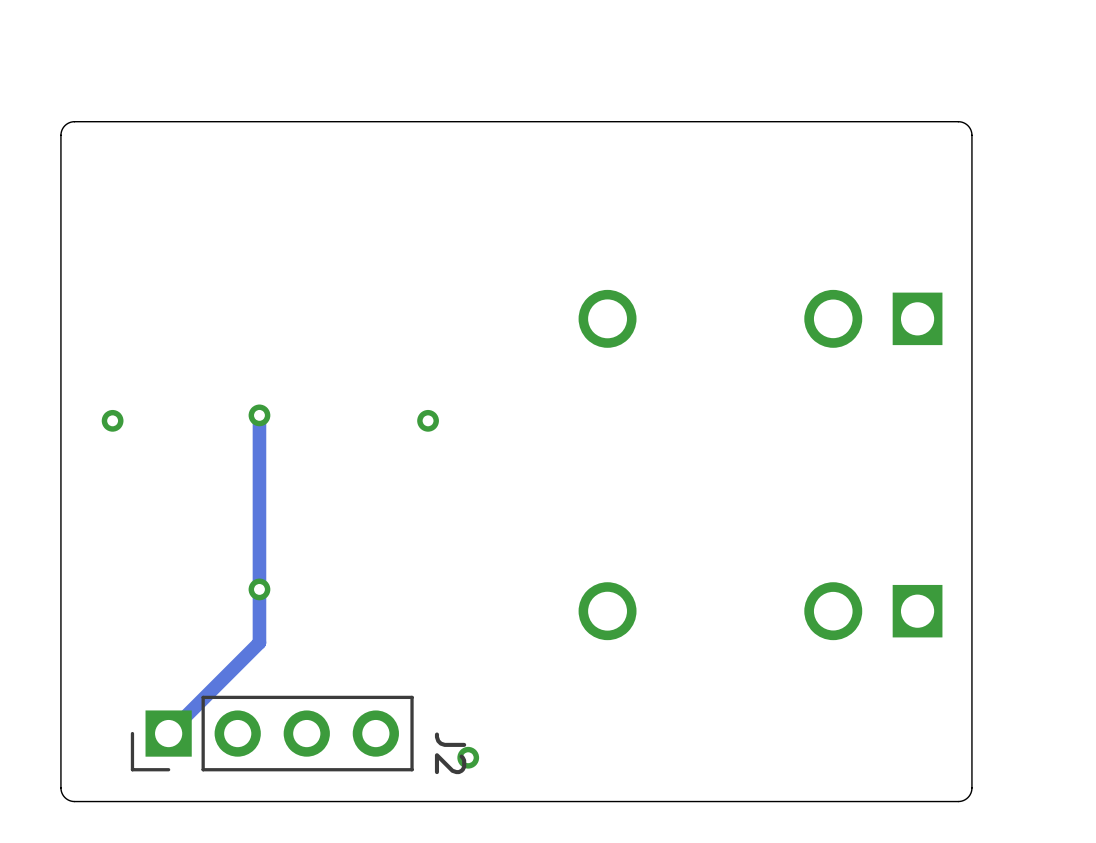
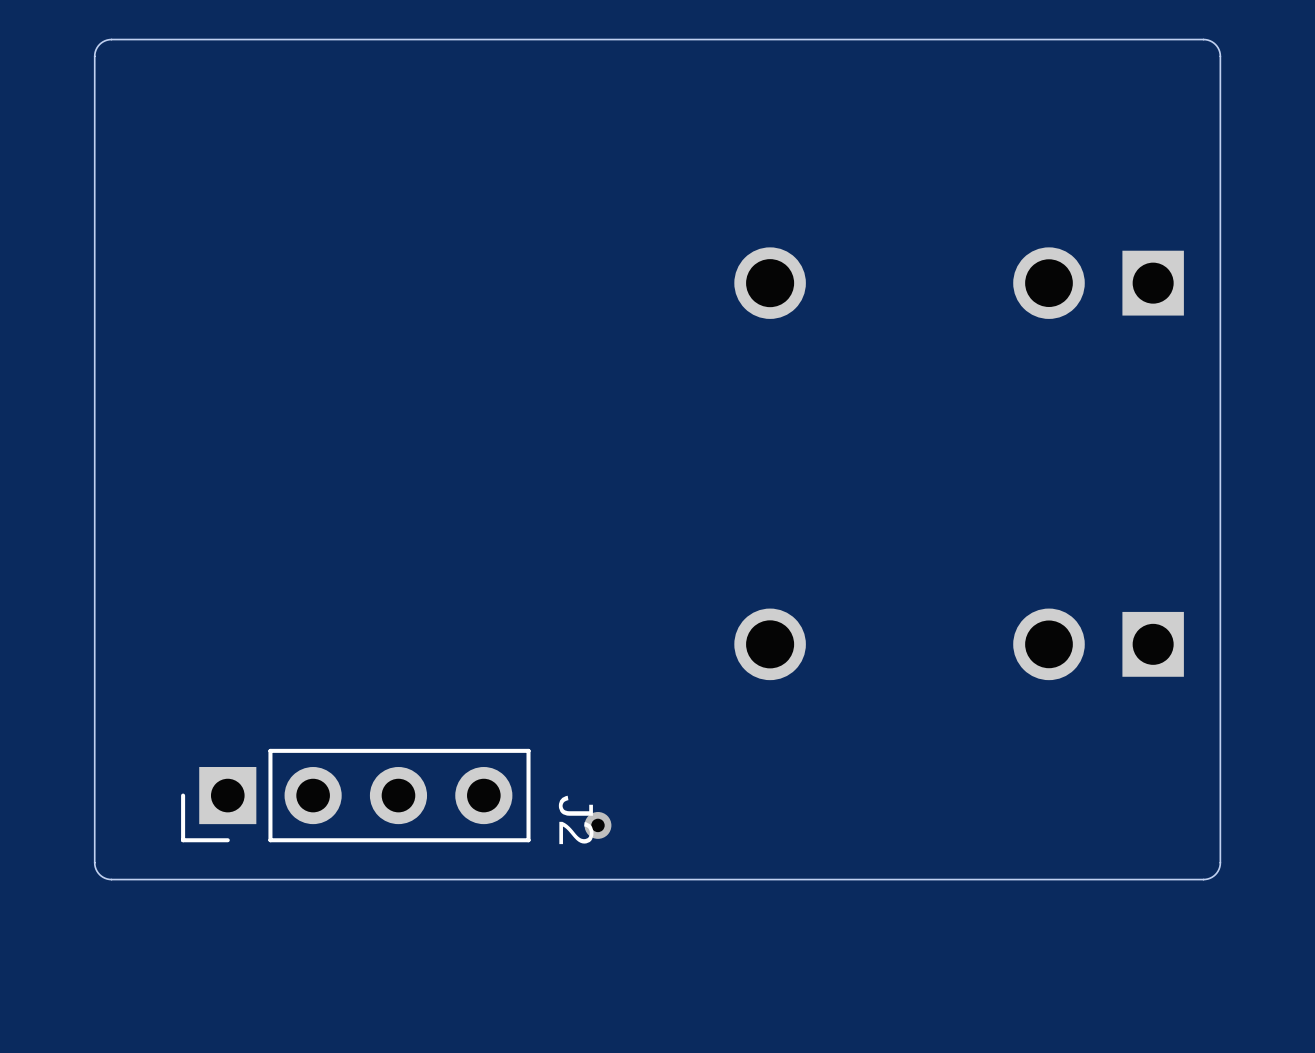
track: (259, 415) (259, 642) (168, 733) -> none
via: (259, 415) -> none
via: (112, 420) -> none
via: (428, 420) -> none
via: (259, 589) -> none

